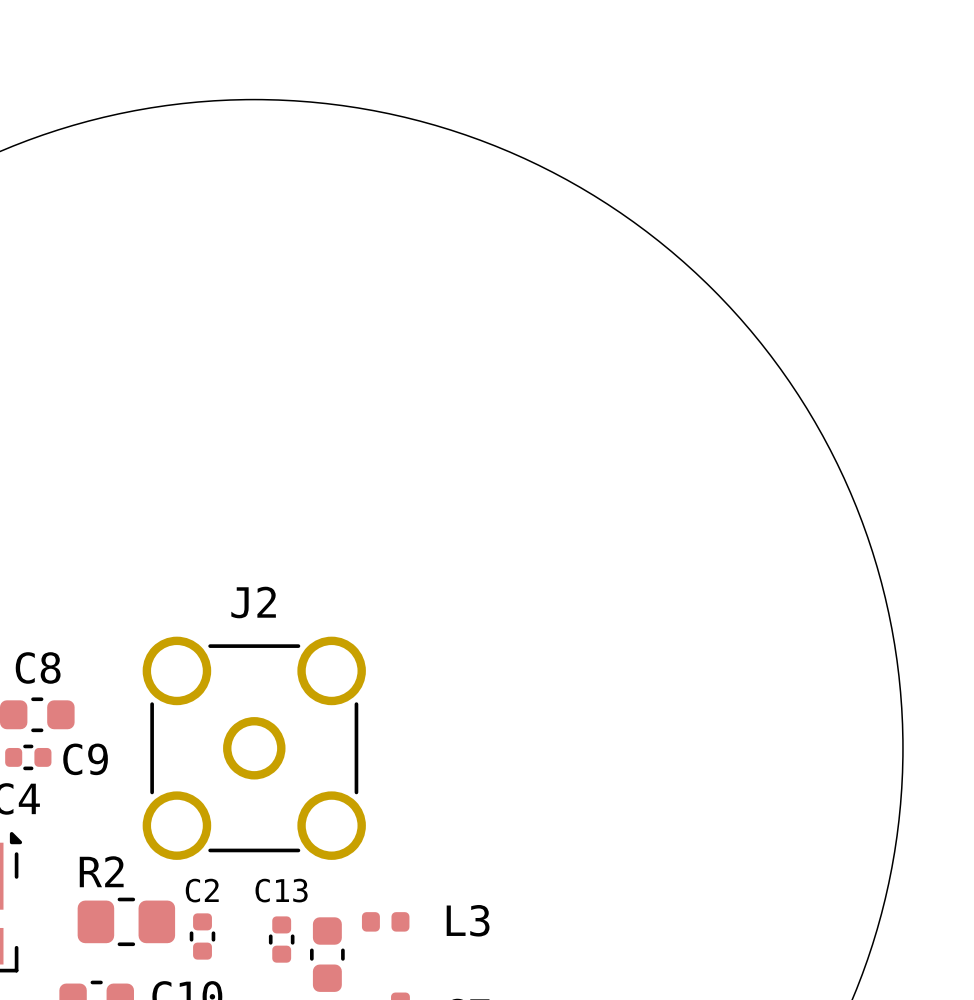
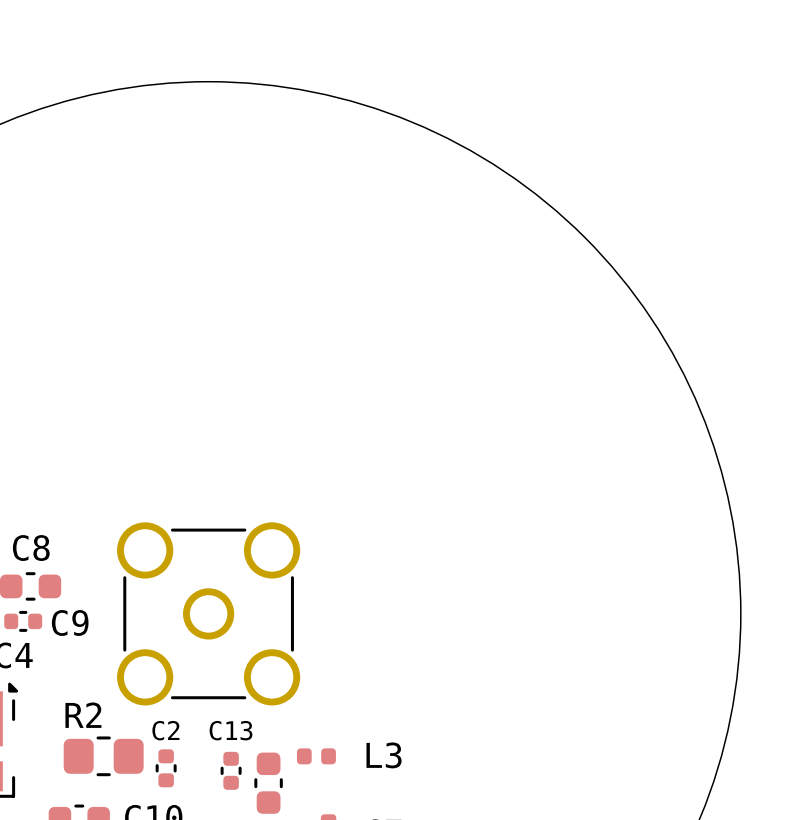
J2 name: J2 (253, 602) -> none

